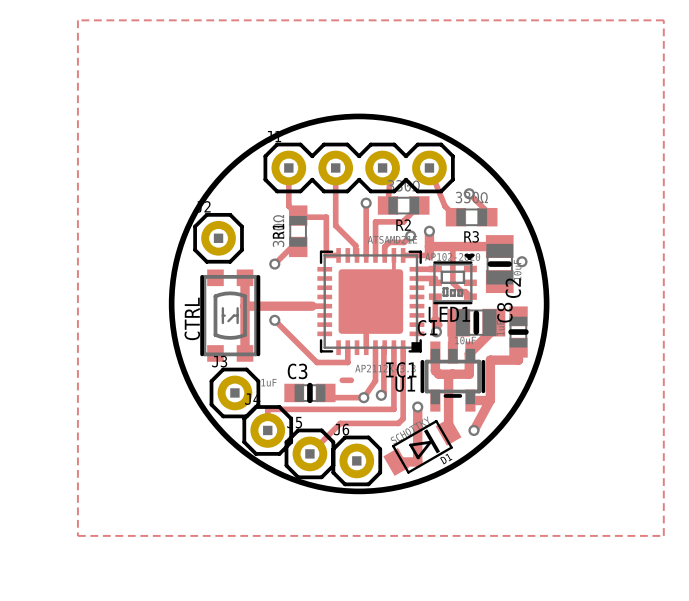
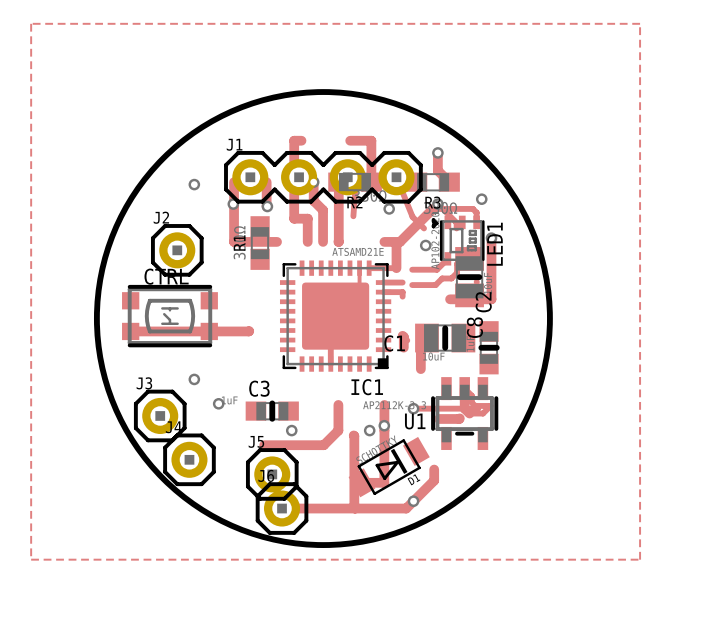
round board edge size: [168, 113, 550, 495] -> [93, 89, 553, 548]
track: none -> (301, 140) (294, 140) (294, 218) (307, 218) (307, 241)
track: none -> (350, 140) (371, 140) (371, 182)
track: none -> (437, 152) (437, 170) (449, 182)
via: none -> (437, 152)
track: (288, 167) (288, 206) (298, 217) (326, 217) (326, 255) (338, 255) -> none
track: (335, 167) (335, 225) (355, 245) (357, 255) -> none
track: none -> (234, 182) (234, 241) (277, 241)
track: none -> (266, 182) (267, 206)
track: none -> (313, 182) (313, 200) (323, 210) (323, 241)
via: none -> (313, 182)
track: none -> (338, 182) (338, 241)
via: none -> (194, 184)
via: none -> (481, 199)
via: none -> (233, 204)
via: none -> (267, 206)
via: none -> (389, 208)
track: (366, 203) (366, 255) -> none
via: (366, 203) -> none
R2 position: (403, 205) -> (355, 182)
track: (419, 205) (403, 221) (375, 221) (375, 255) -> none
track: none -> (476, 222) (476, 212) (472, 208) (433, 208) (400, 241) (384, 241)
R3 position: (471, 217) -> (433, 182)
track: none -> (491, 238) (491, 299) (450, 299)
via: none -> (491, 238)
via: (429, 231) -> none
via: none -> (425, 245)
track: (410, 235) (404, 242) (389, 242) (384, 247) (384, 255) -> none
via: (410, 235) -> none
track: (298, 246) (291, 246) (274, 264) -> none
track: (429, 246) (499, 246) -> none
track: (452, 246) (452, 282) (470, 296) -> none
track: none -> (447, 258) (436, 269) (412, 269)
track: none -> (462, 258) (457, 264) (457, 272) (451, 278) (442, 278) (435, 285) (412, 285)
via: (521, 261) -> none
via: (274, 264) -> none
track: (245, 277) (245, 353) (245, 277) -> none
LED1 rotation: 0° (452, 279) -> 90° counterclockwise (458, 240)
LED1 position: (452, 279) -> (458, 240)
track: (435, 296) (435, 320) -> none
track: (245, 306) (324, 306) -> none
CTRL rotation: 0° (230, 315) -> 90° clockwise (169, 316)
track: none -> (249, 331) (130, 331)
track: (274, 320) (316, 362) (347, 362) (347, 347) -> none
via: (274, 320) -> none
track: (493, 322) (493, 329) (469, 353) (469, 374) (438, 374) (435, 370) (435, 352) -> none
via: (436, 331) -> none
track: (375, 347) (375, 380) (363, 397) (332, 397) (325, 392) -> none
track: (384, 347) (383, 392) (381, 395) -> none
track: (393, 347) (393, 409) (267, 409) (267, 430) -> none
track: (403, 347) (403, 418) (398, 423) (340, 423) (309, 453) -> none
track: (518, 347) (518, 360) (490, 360) (490, 399) (473, 430) -> none
via: none -> (194, 379)
track: (452, 374) (448, 377) (448, 431) -> none
U1 position: (452, 376) -> (464, 413)
track: (342, 380) (351, 380) -> none
via: none -> (218, 403)
track: none -> (338, 404) (338, 430) (323, 445) (264, 445)
track: none -> (475, 405) (490, 405) (483, 413) (469, 413) (464, 408) (464, 388) (471, 395) (471, 402) (477, 408) (413, 408)
via: none -> (413, 408)
J3 position: (234, 392) -> (160, 415)
via: (381, 395) -> none
via: (363, 397) -> none
via: none -> (291, 430)
via: none -> (369, 430)
track: none -> (353, 435) (355, 508)
J4 position: (267, 430) -> (189, 459)
via: (473, 430) -> none
track: none -> (434, 469) (434, 480) (406, 508) (282, 508)
J6 position: (356, 460) -> (282, 508)
via: none -> (413, 501)

